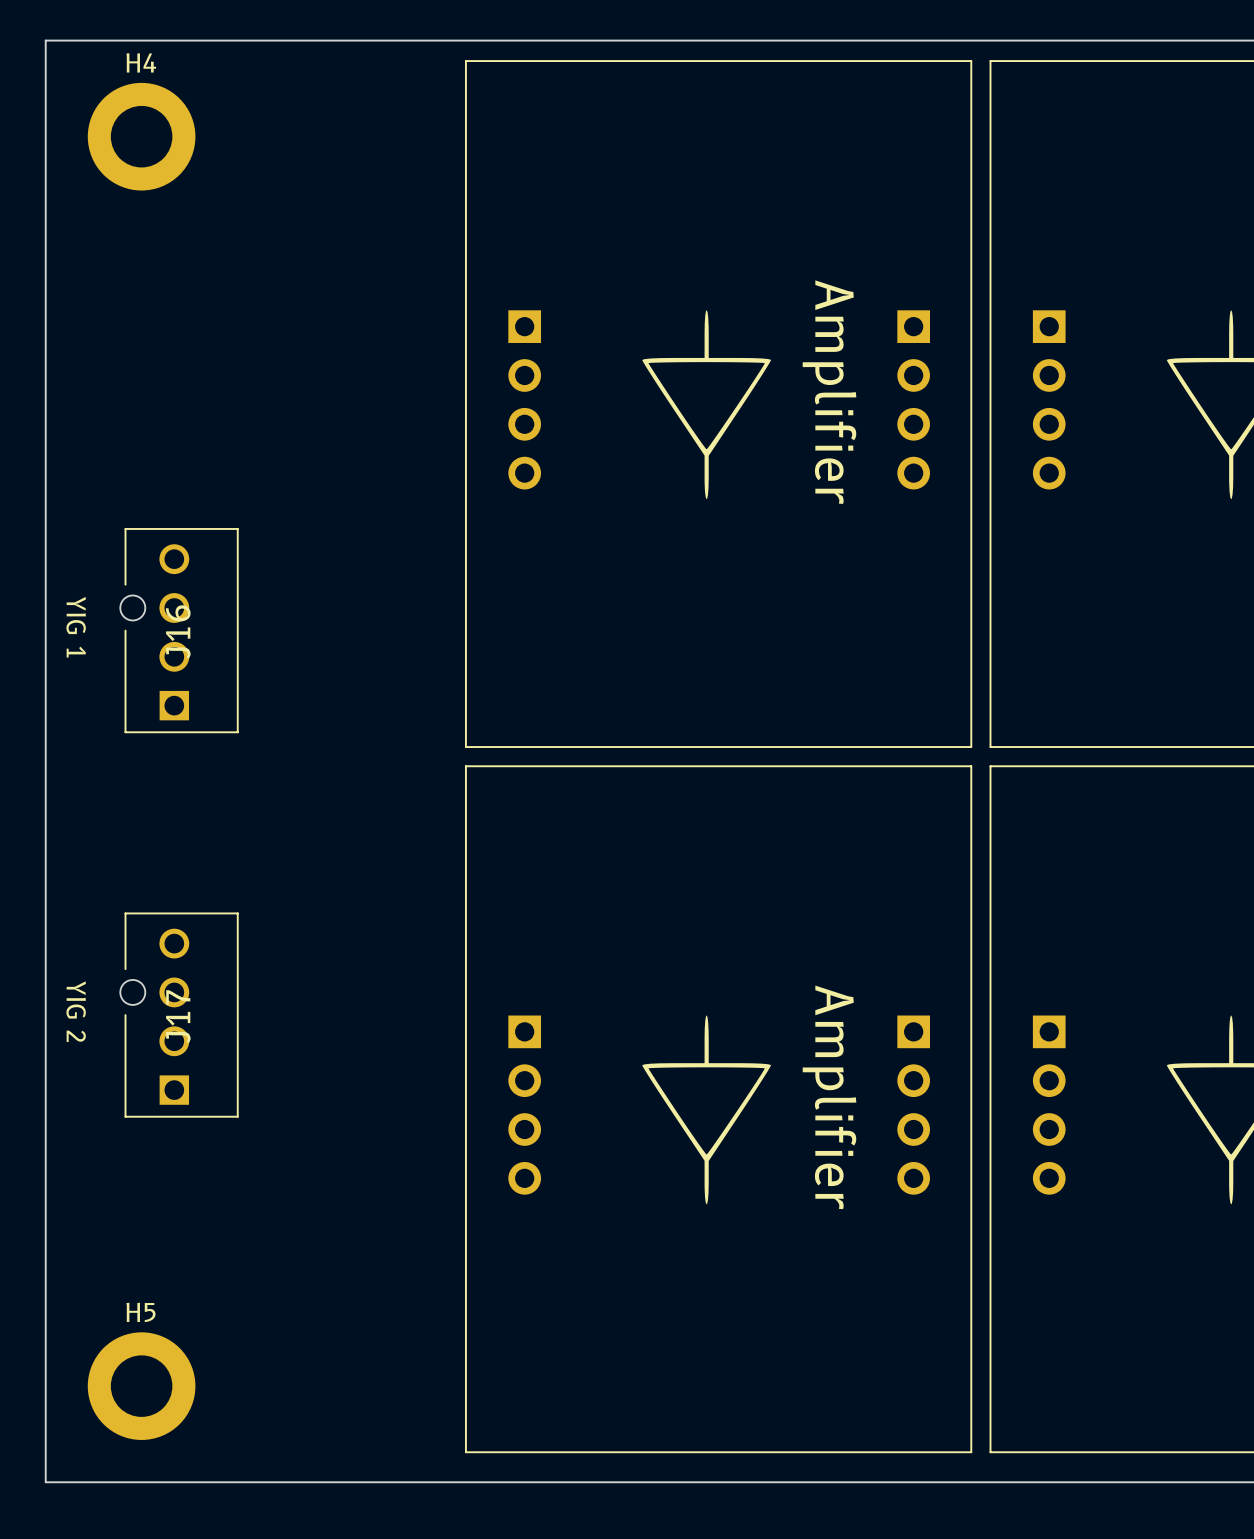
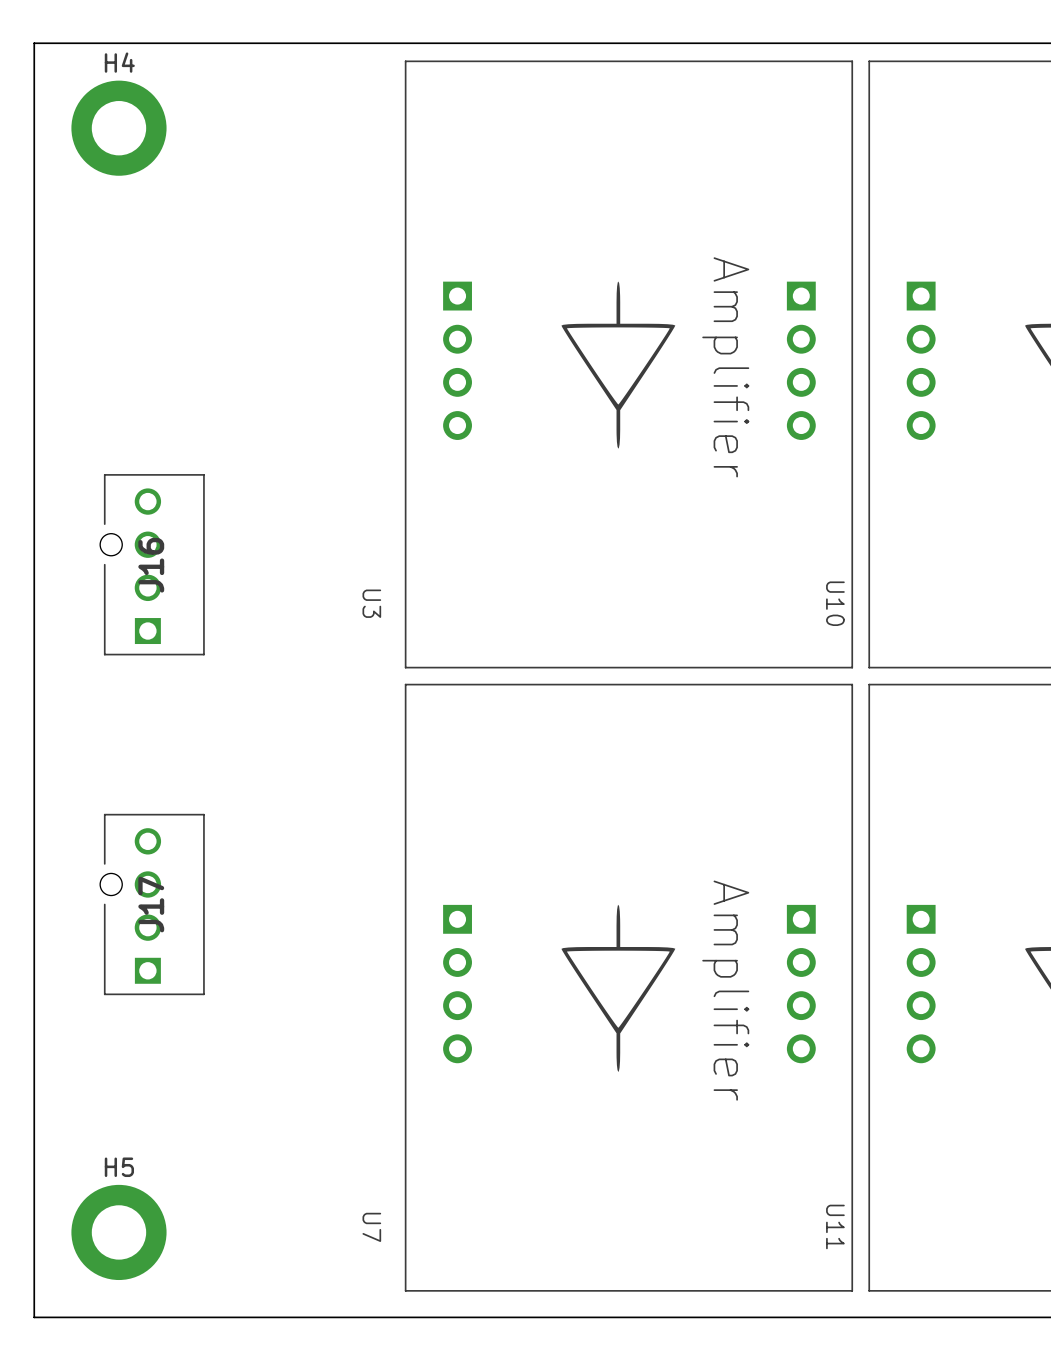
text: YIG 1 (76, 627) -> none
U3 name: none -> U3 (371, 603)
U10 name: none -> U10 (835, 603)
text: YIG 2 (76, 1011) -> none
U11 name: none -> U11 (835, 1226)
U7 name: none -> U7 (371, 1227)

